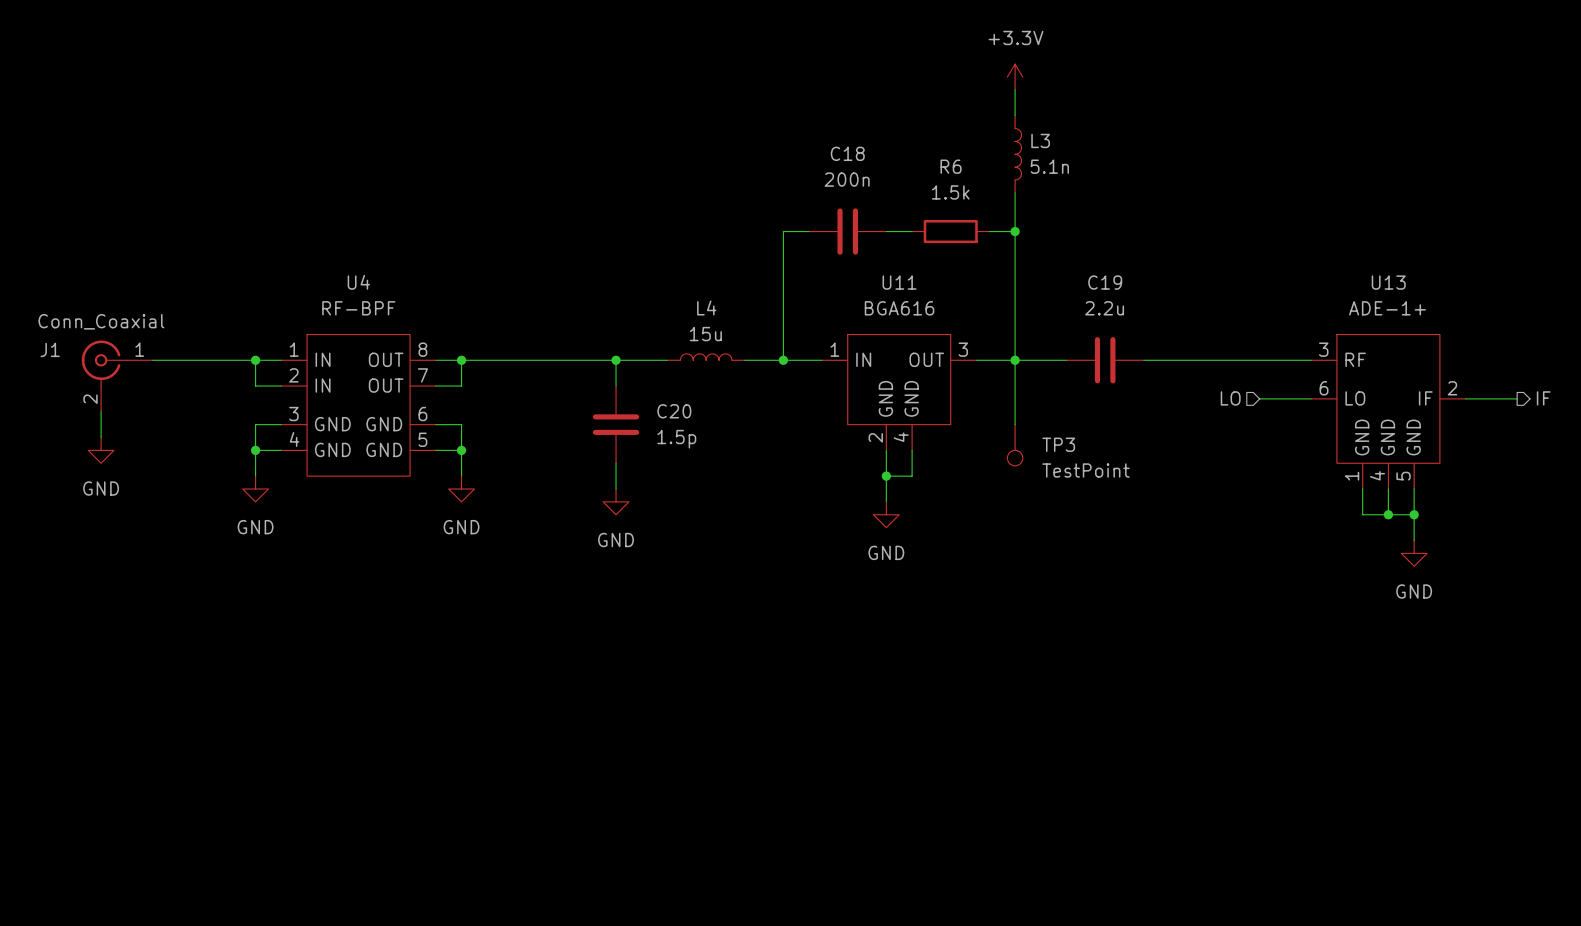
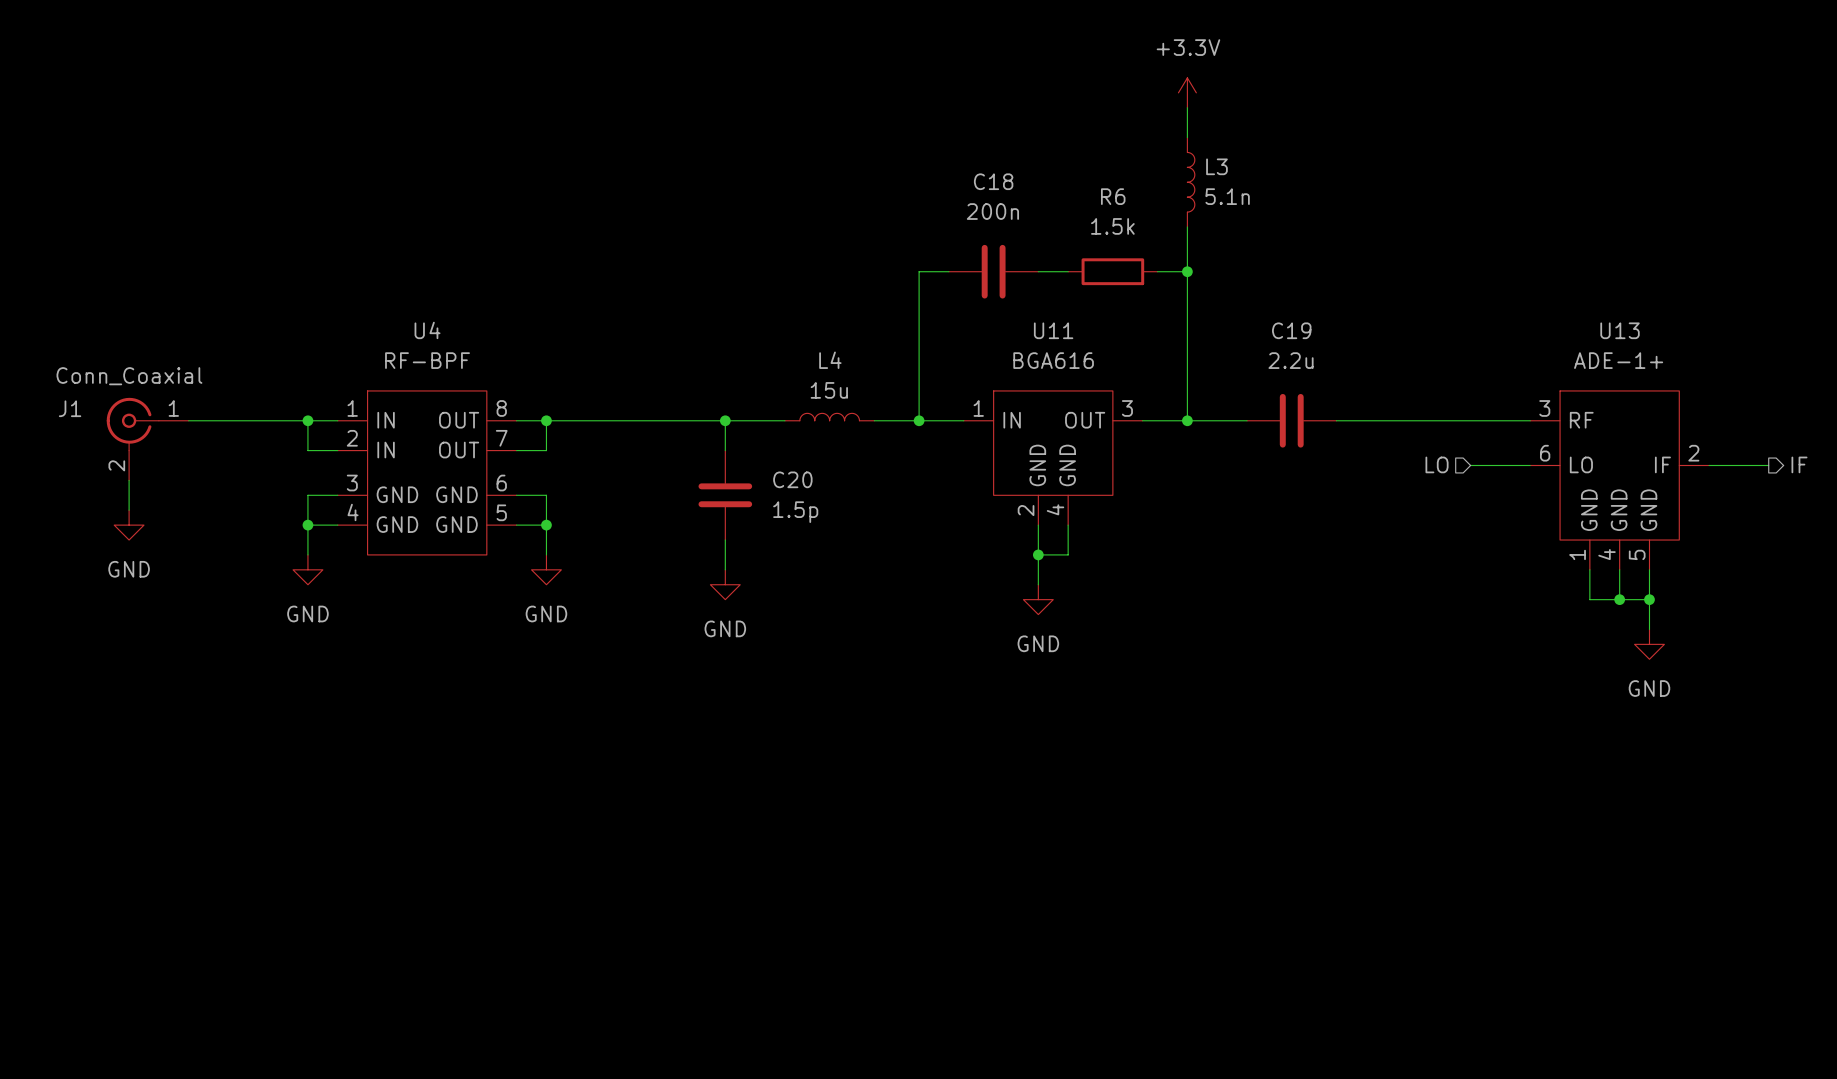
wire: (1015, 360) (1015, 424) -> none
TP3: TestPoint (1015, 445) -> none

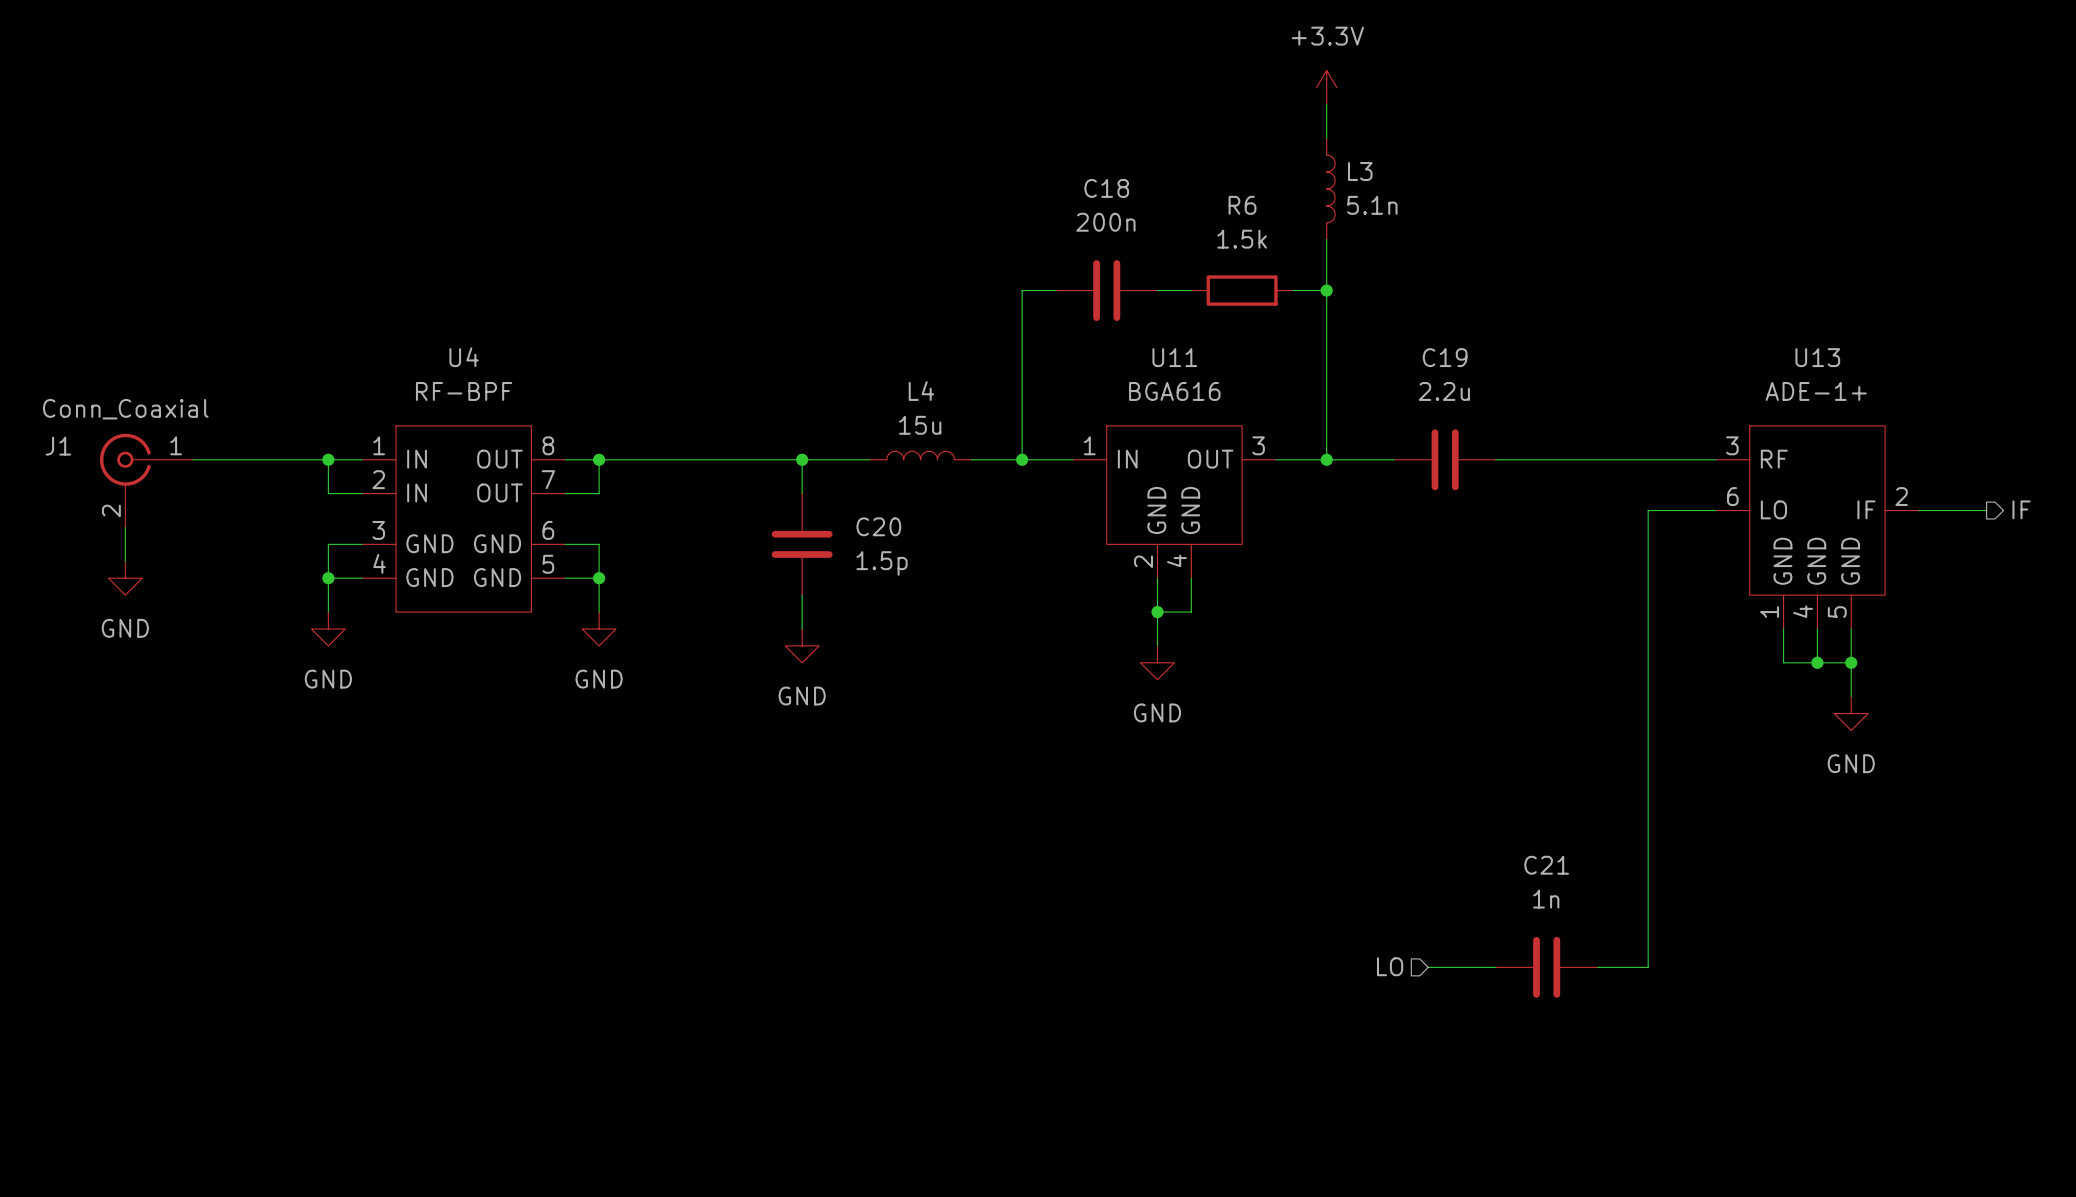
hierarchical label: LO (1437, 464) -> none
wire: none -> (1648, 510) (1648, 967) (1597, 967)
hierarchical label: none -> LO (1390, 966)
wire: none -> (1428, 967) (1495, 967)
C21: none -> 1n (1546, 967)

